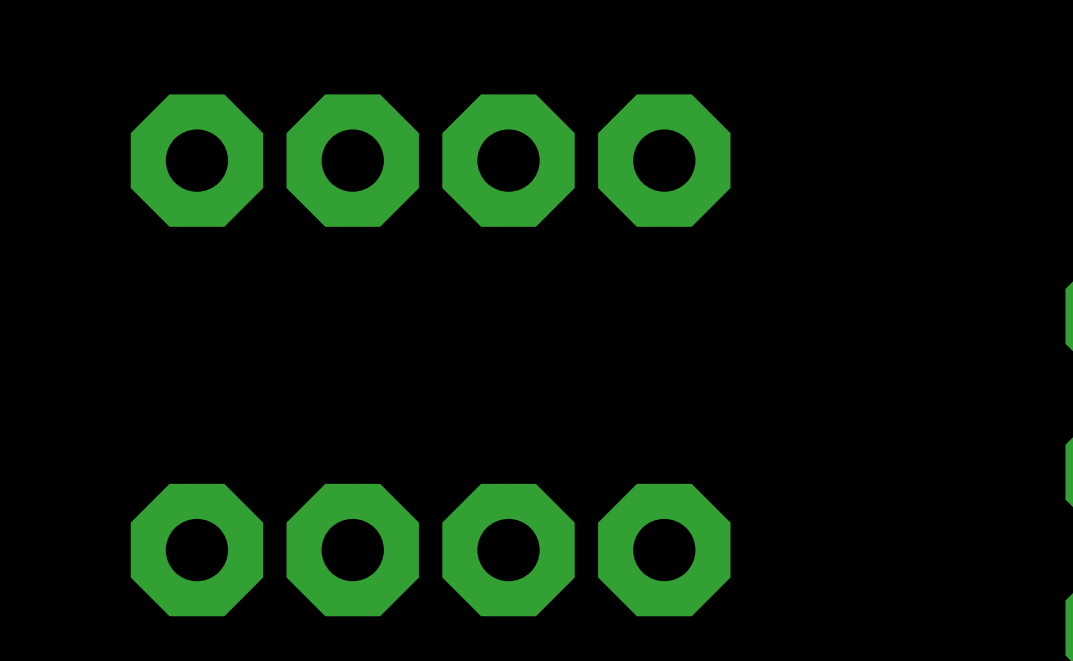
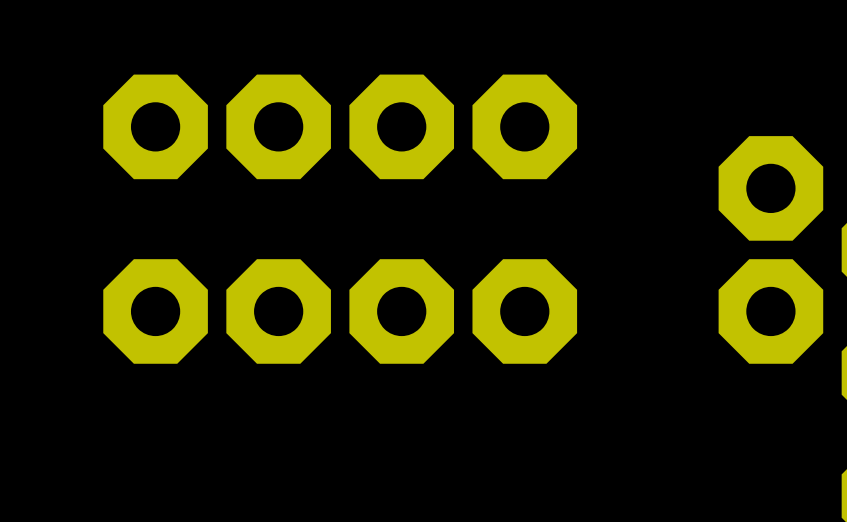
part: none -> (770, 188)
part: none -> (155, 311)
part: none -> (278, 311)
part: none -> (401, 311)
part: none -> (524, 311)
part: none -> (770, 311)
part: (196, 550) -> none
part: (352, 550) -> none
part: (508, 550) -> none
part: (664, 550) -> none

